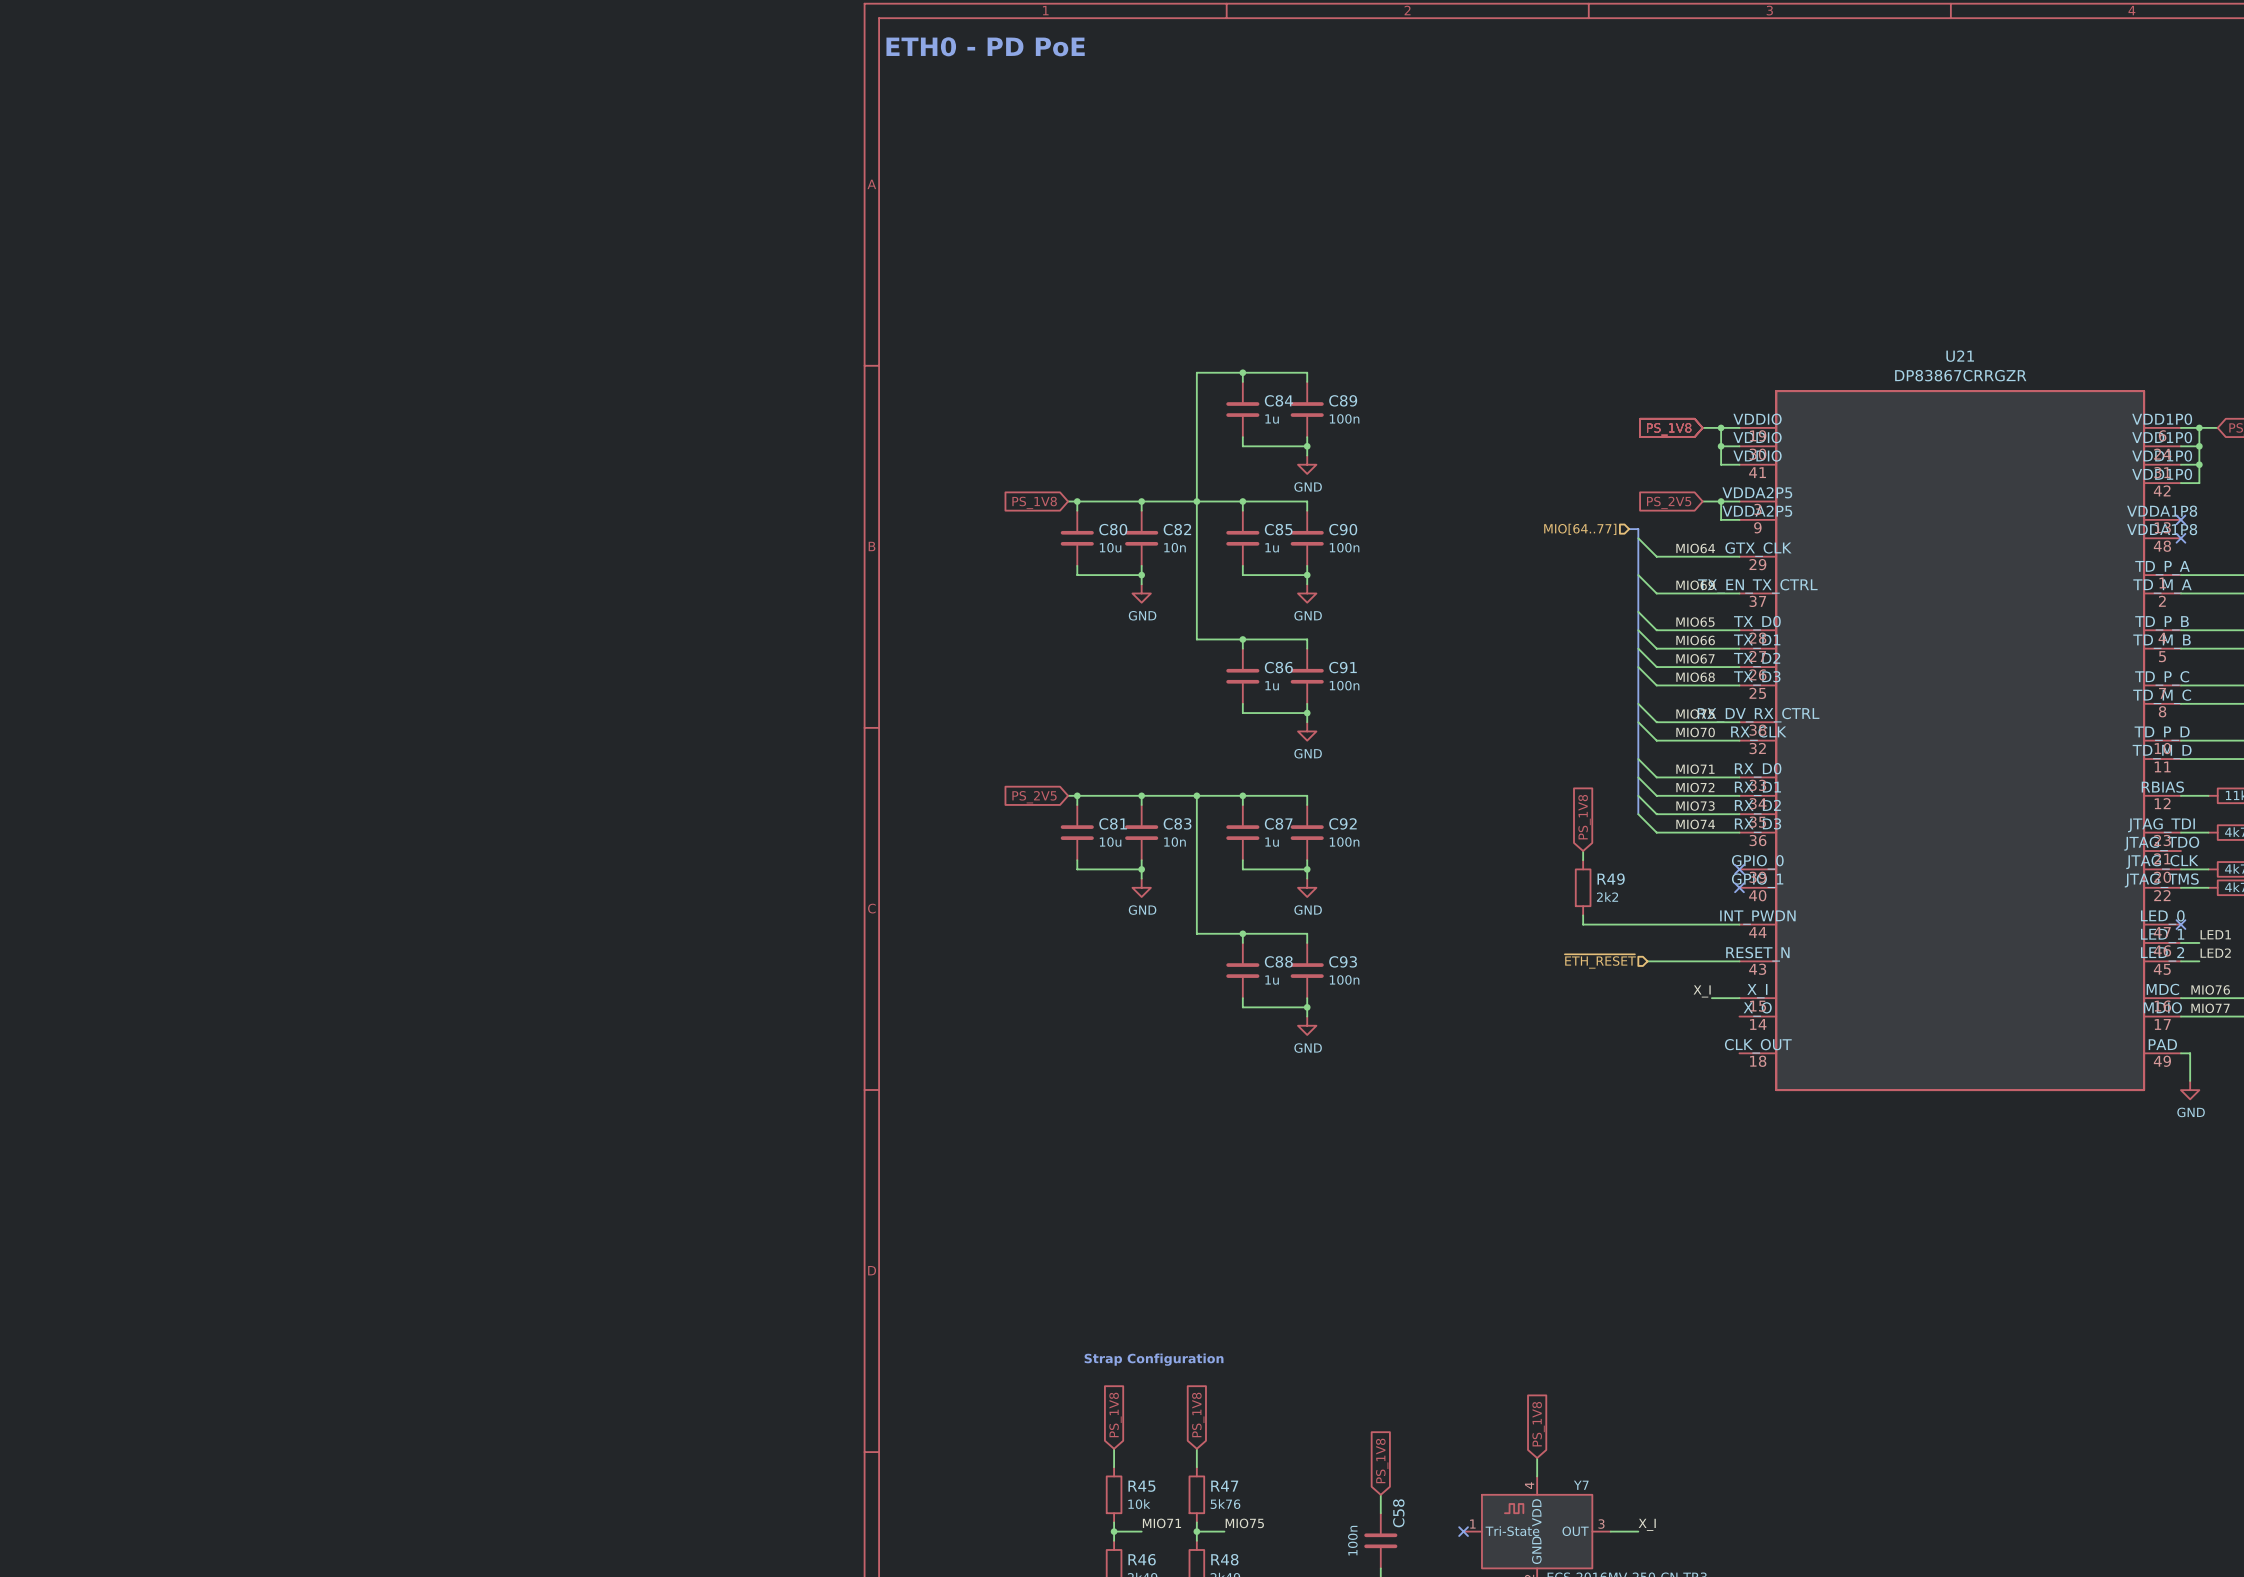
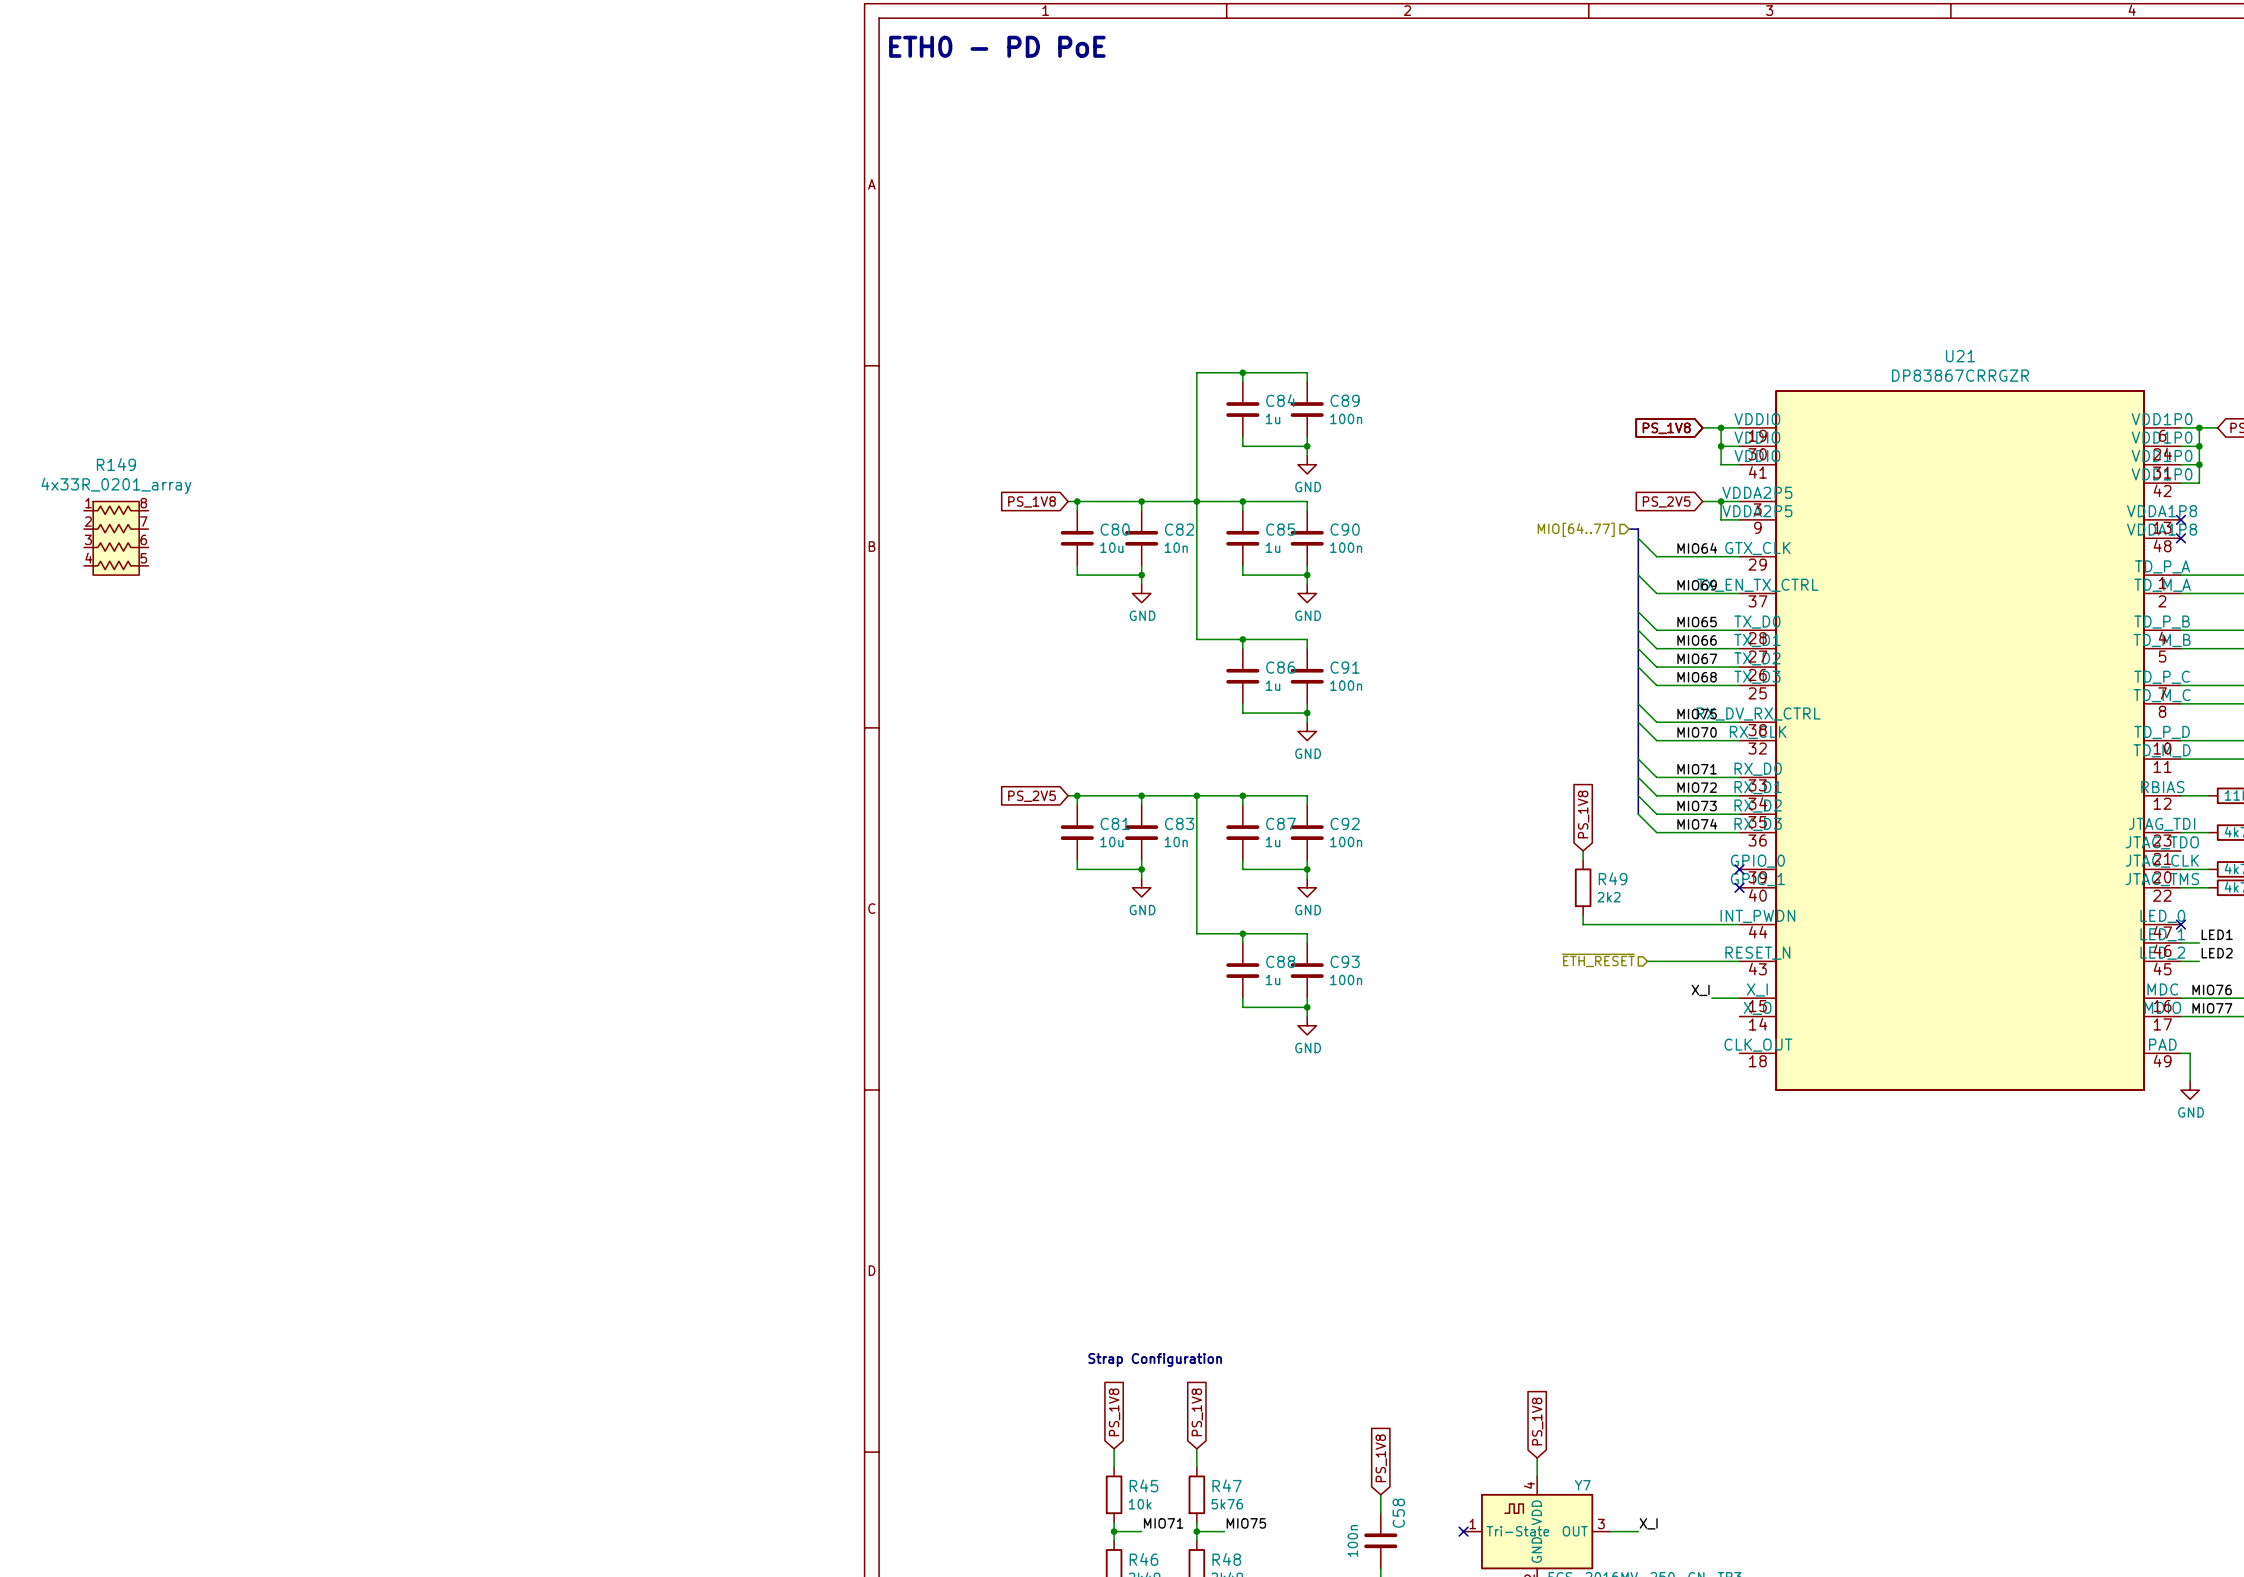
R149: none -> 4x33R_0201_array (116, 538)

